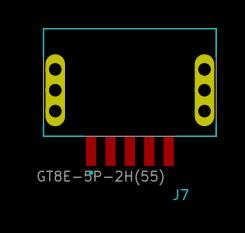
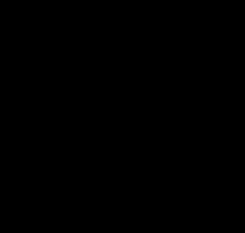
J7: GT8E-5P-2H(55) (129, 101) -> none

